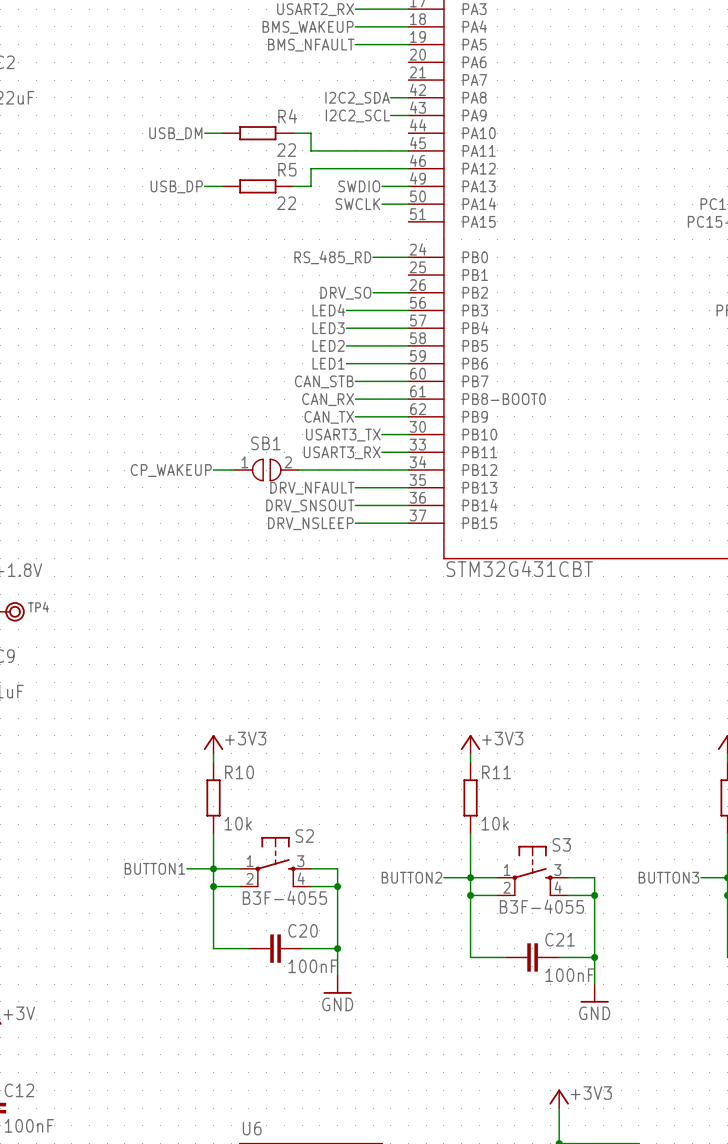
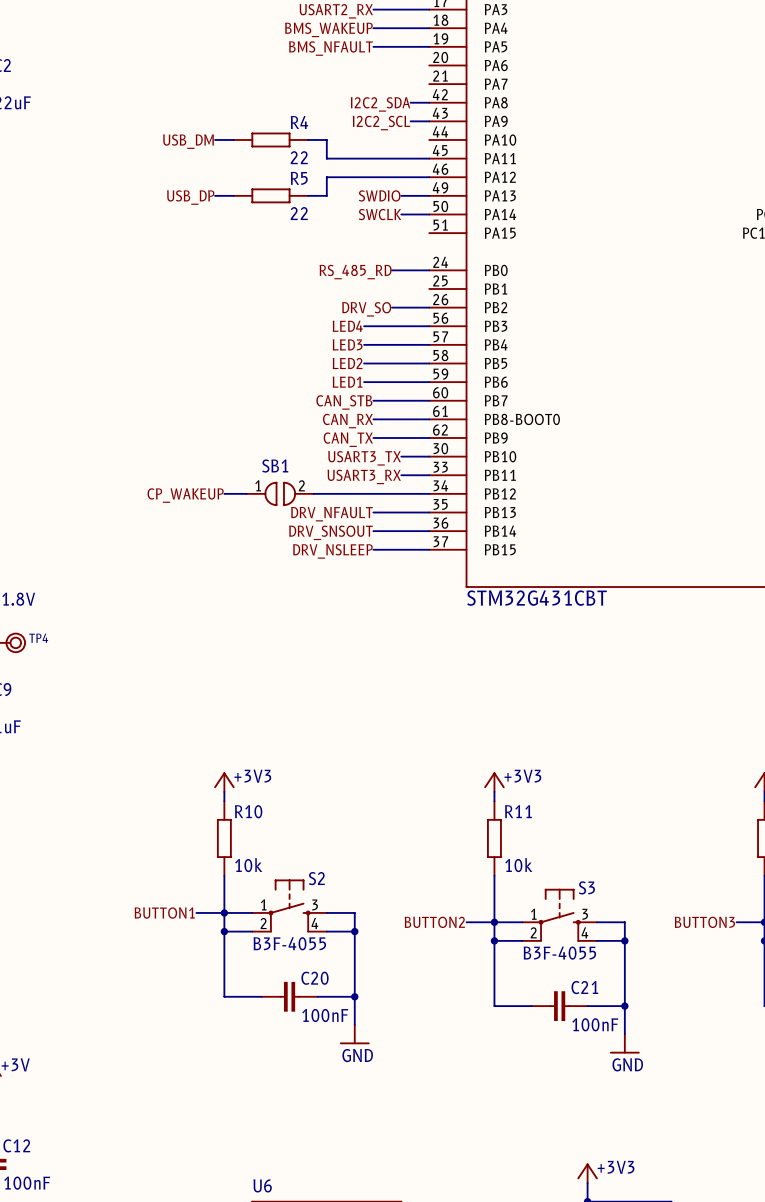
power symbol position: +3V3 (559, 1098) -> +3V3 (587, 1173)

